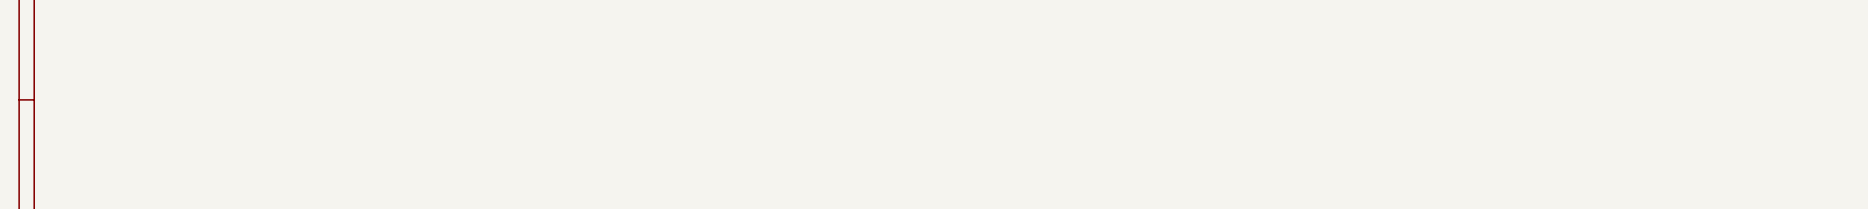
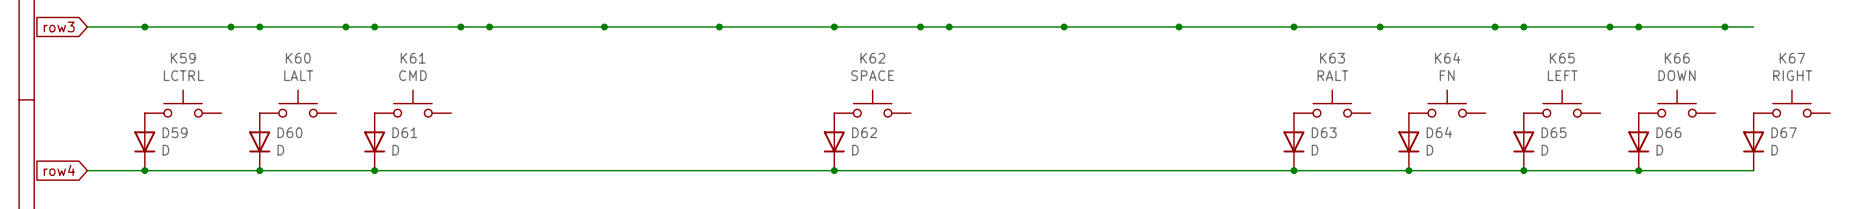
global label: none -> row3 (59, 26)
wire: none -> (87, 26) (1753, 26)
junction: none -> (144, 26)
junction: none -> (231, 26)
junction: none -> (259, 26)
junction: none -> (345, 26)
junction: none -> (374, 26)
junction: none -> (460, 26)
junction: none -> (489, 26)
junction: none -> (604, 26)
junction: none -> (719, 26)
junction: none -> (834, 26)
junction: none -> (920, 26)
junction: none -> (949, 26)
junction: none -> (1064, 26)
junction: none -> (1179, 26)
junction: none -> (1293, 26)
junction: none -> (1380, 26)
junction: none -> (1495, 26)
junction: none -> (1523, 26)
junction: none -> (1610, 26)
junction: none -> (1638, 26)
junction: none -> (1724, 26)
K59: none -> LCTRL (183, 103)
K60: none -> LALT (298, 103)
K61: none -> CMD (412, 103)
K62: none -> SPACE (872, 103)
K63: none -> RALT (1332, 103)
K64: none -> FN (1447, 103)
K65: none -> LEFT (1562, 103)
K66: none -> DOWN (1677, 103)
K67: none -> RIGHT (1791, 103)
D59: none -> D (144, 141)
D60: none -> D (259, 141)
D61: none -> D (374, 141)
D62: none -> D (834, 141)
D63: none -> D (1293, 141)
D64: none -> D (1408, 141)
D65: none -> D (1523, 141)
D66: none -> D (1638, 141)
D67: none -> D (1753, 141)
global label: none -> row4 (59, 170)
wire: none -> (87, 170) (1753, 170)
junction: none -> (144, 170)
junction: none -> (259, 170)
junction: none -> (374, 170)
junction: none -> (834, 170)
junction: none -> (1293, 170)
junction: none -> (1408, 170)
junction: none -> (1523, 170)
junction: none -> (1638, 170)

